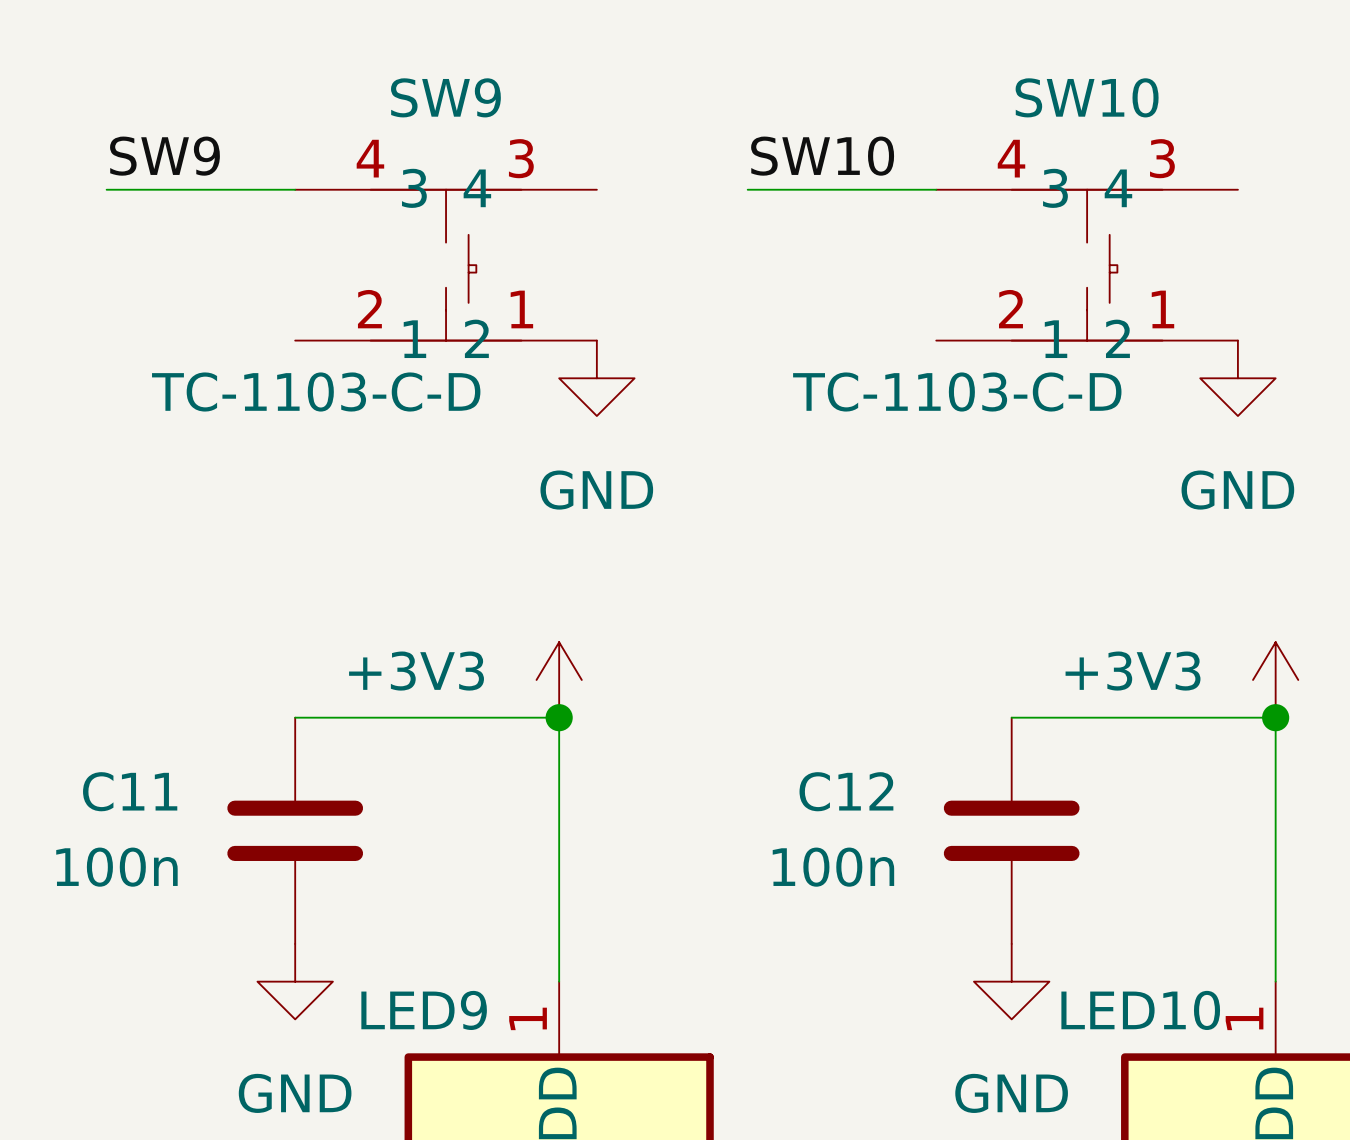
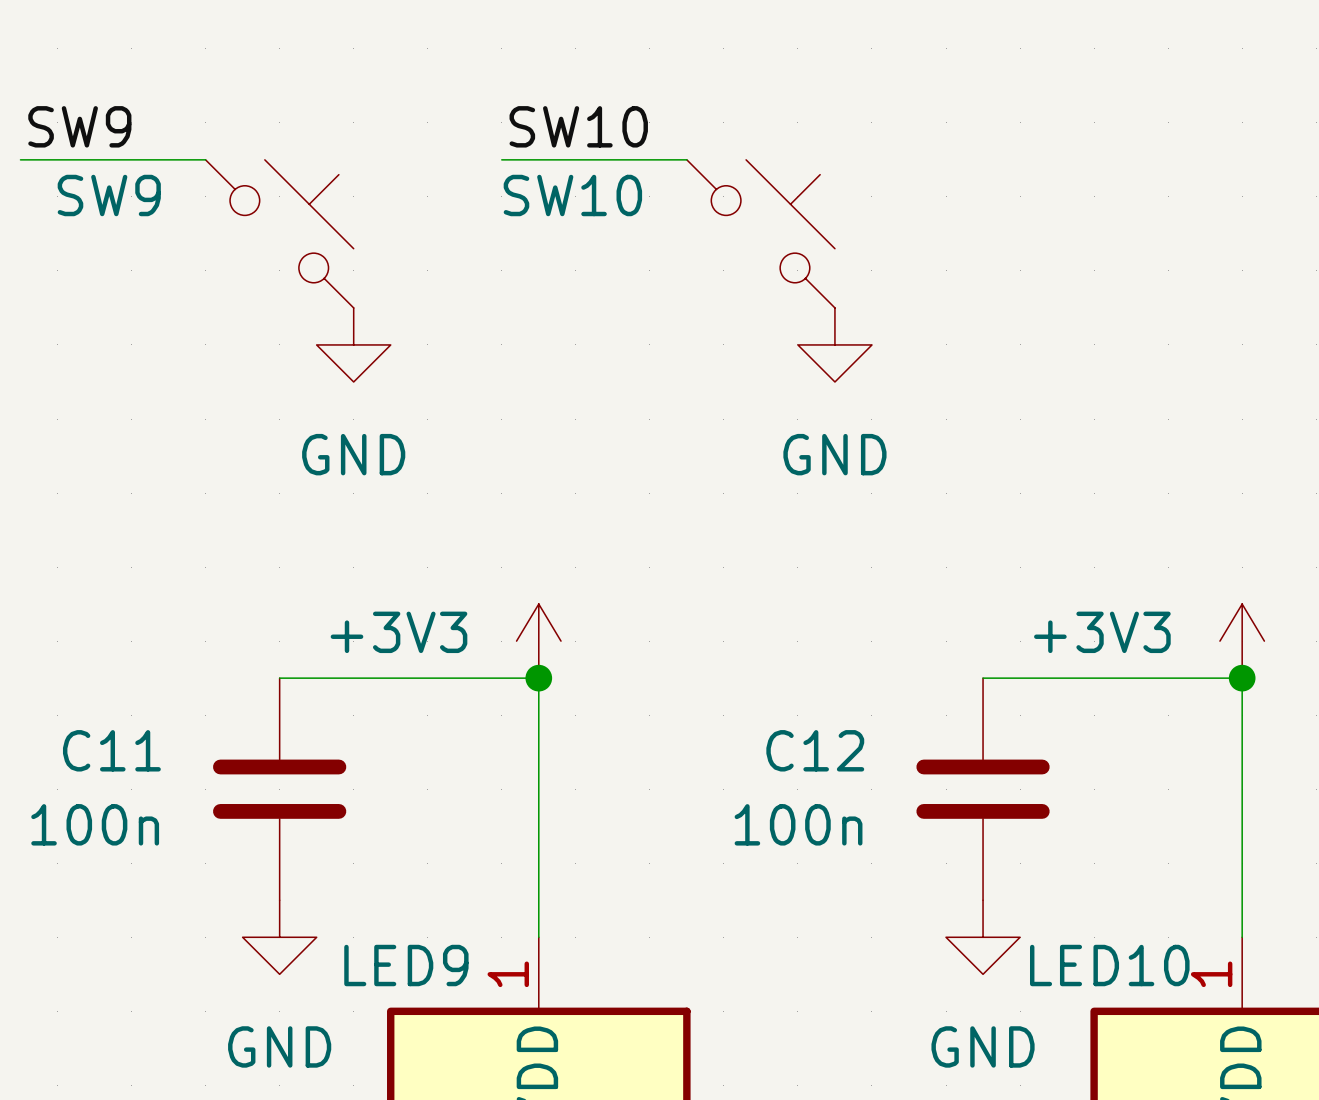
SW9 name position: SW9 (445, 97) -> SW9 (109, 195)
SW10 name position: SW10 (1087, 97) -> SW10 (572, 195)
label position: SW9 (164, 156) -> SW9 (79, 126)
label position: SW10 (822, 156) -> SW10 (578, 126)
wire: (219, 189) (295, 189) -> (20, 159) (94, 159)
SW9 symbol: [295, 189, 597, 341] -> [205, 159, 354, 308]
wire: (747, 189) (936, 189) -> (501, 159) (686, 159)
SW10 symbol: [936, 189, 1238, 341] -> [686, 159, 835, 308]
power symbol: none -> GND (353, 344)
power symbol: GND (596, 378) -> none
power symbol: none -> GND (834, 344)
power symbol: GND (1237, 378) -> none
SW9 value: TC-1103-C-D (316, 391) -> none
SW10 value: TC-1103-C-D (957, 391) -> none

